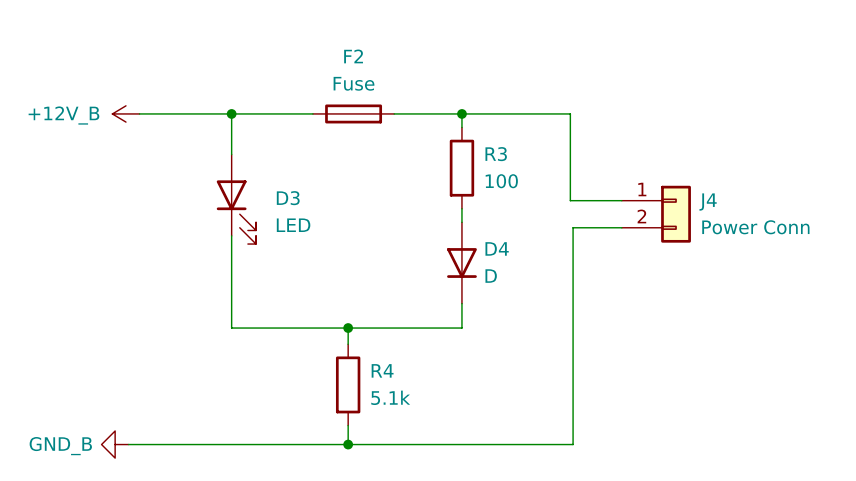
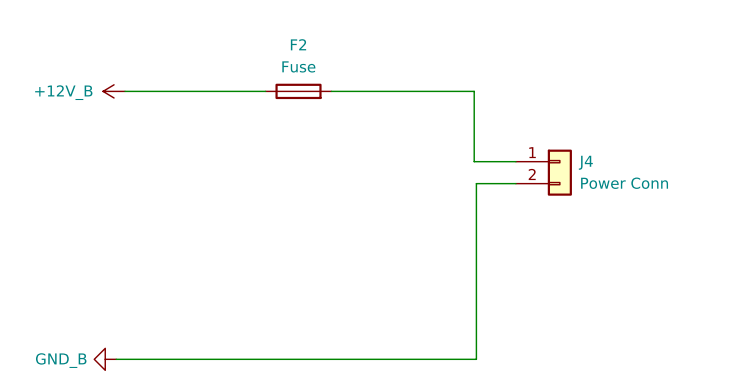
wire: (231, 113) (231, 154) -> none
junction: (231, 113) -> none
wire: (461, 113) (461, 127) -> none
junction: (461, 113) -> none
R3: 100 (461, 168) -> none
D3: LED (236, 199) -> none
wire: (461, 208) (461, 222) -> none
wire: (231, 235) (231, 328) (461, 328) (461, 303) -> none
D4: D (461, 262) -> none
wire: (348, 328) (348, 344) -> none
junction: (348, 328) -> none
R4: 5.1k (348, 384) -> none
wire: (348, 425) (348, 444) -> none
junction: (348, 444) -> none

